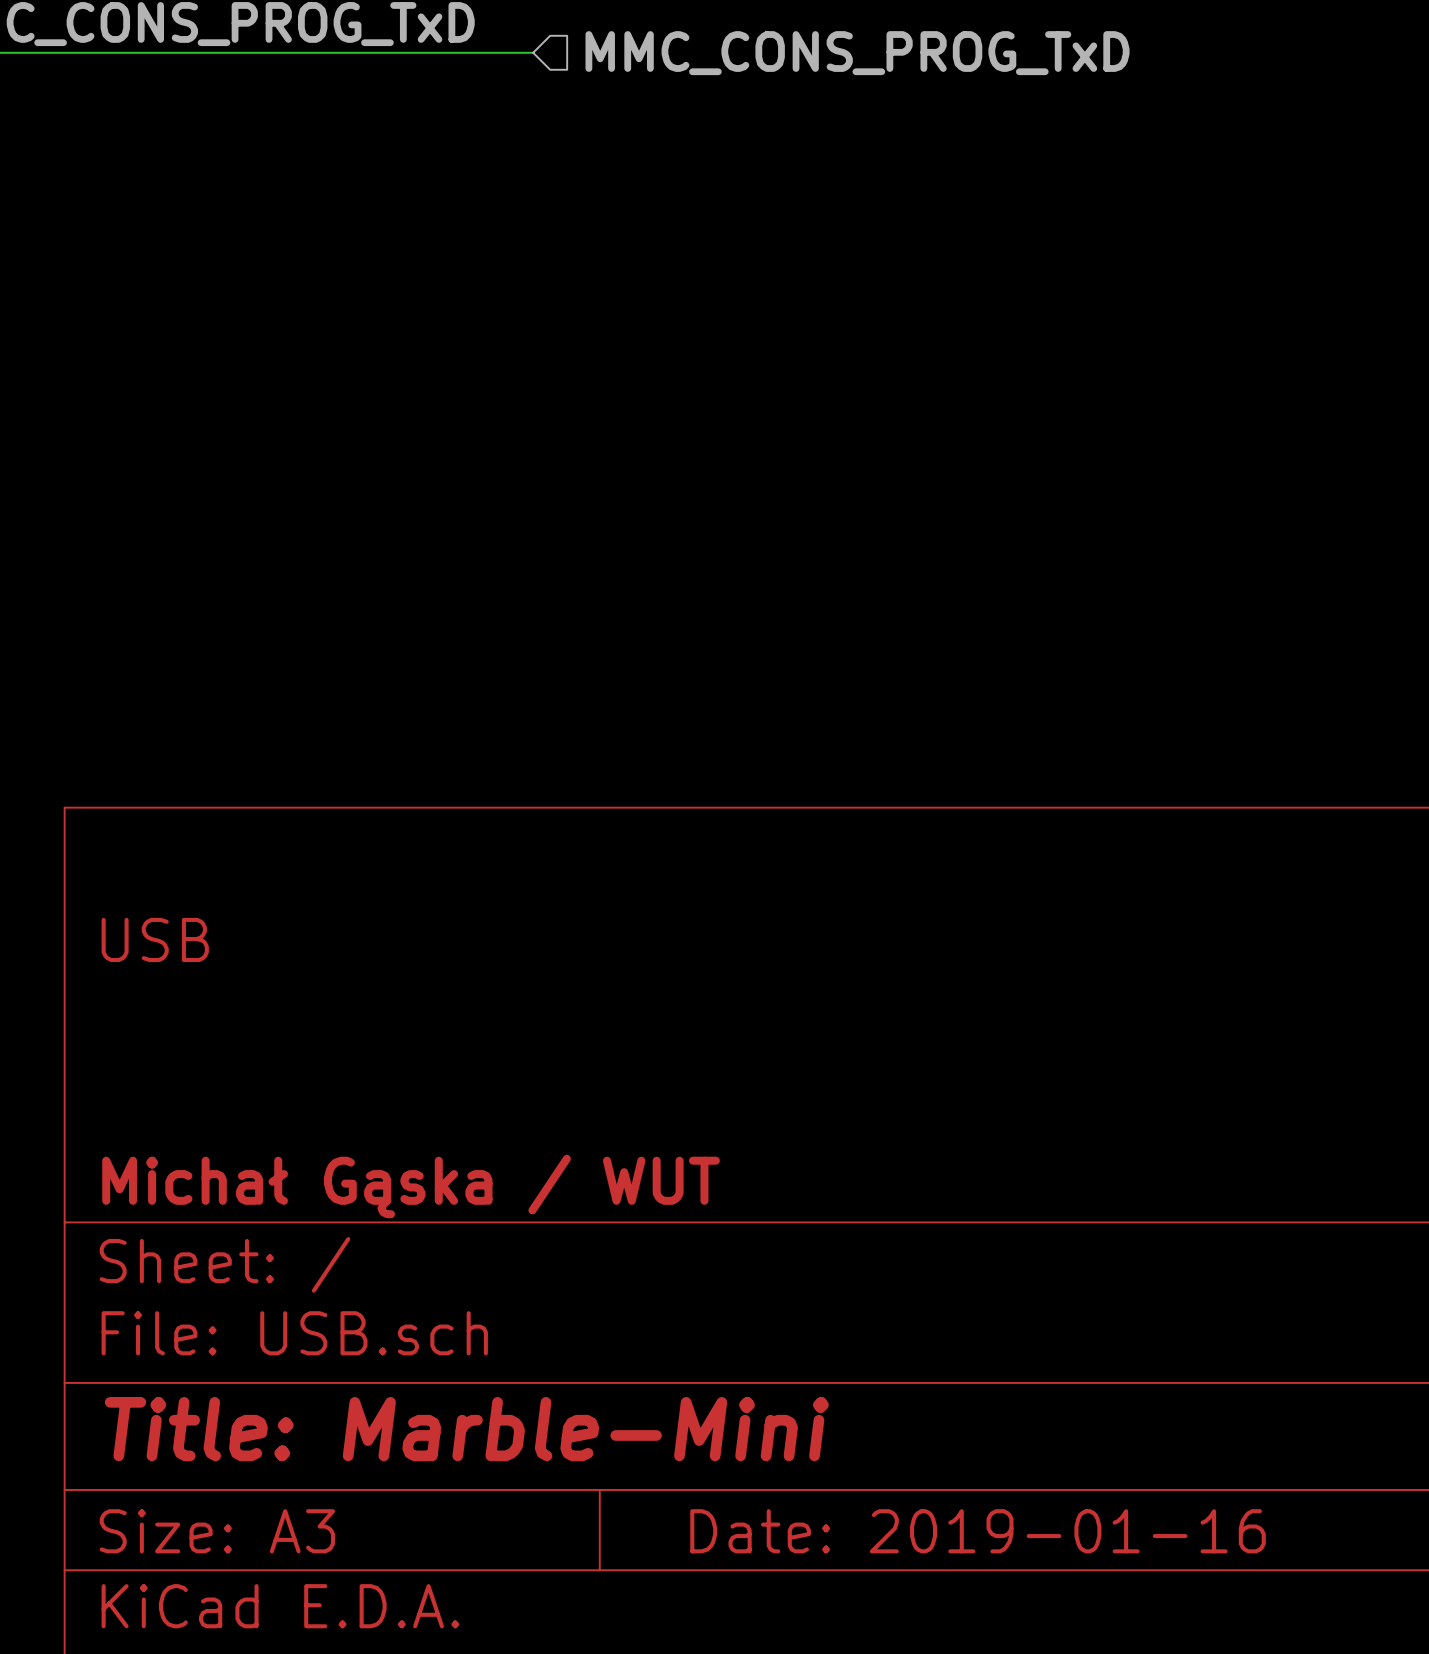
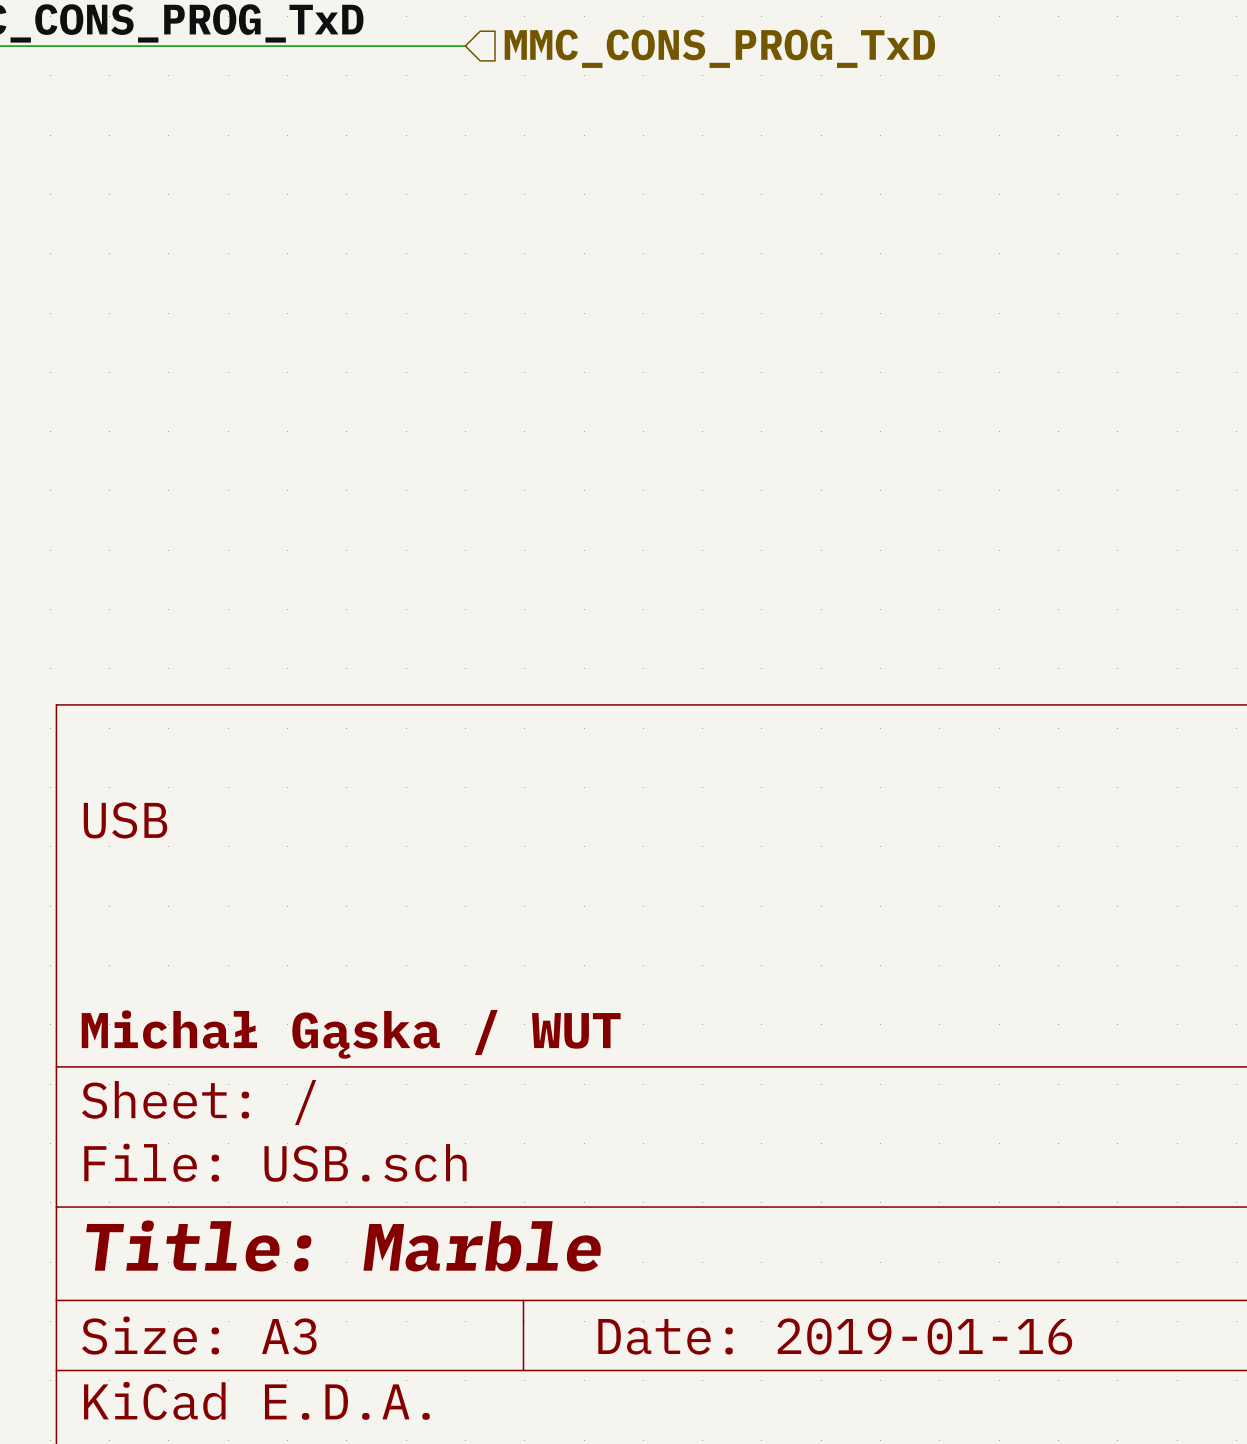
title block: Title: Marble-Mini (466, 1429) -> Title: Marble (343, 1245)

